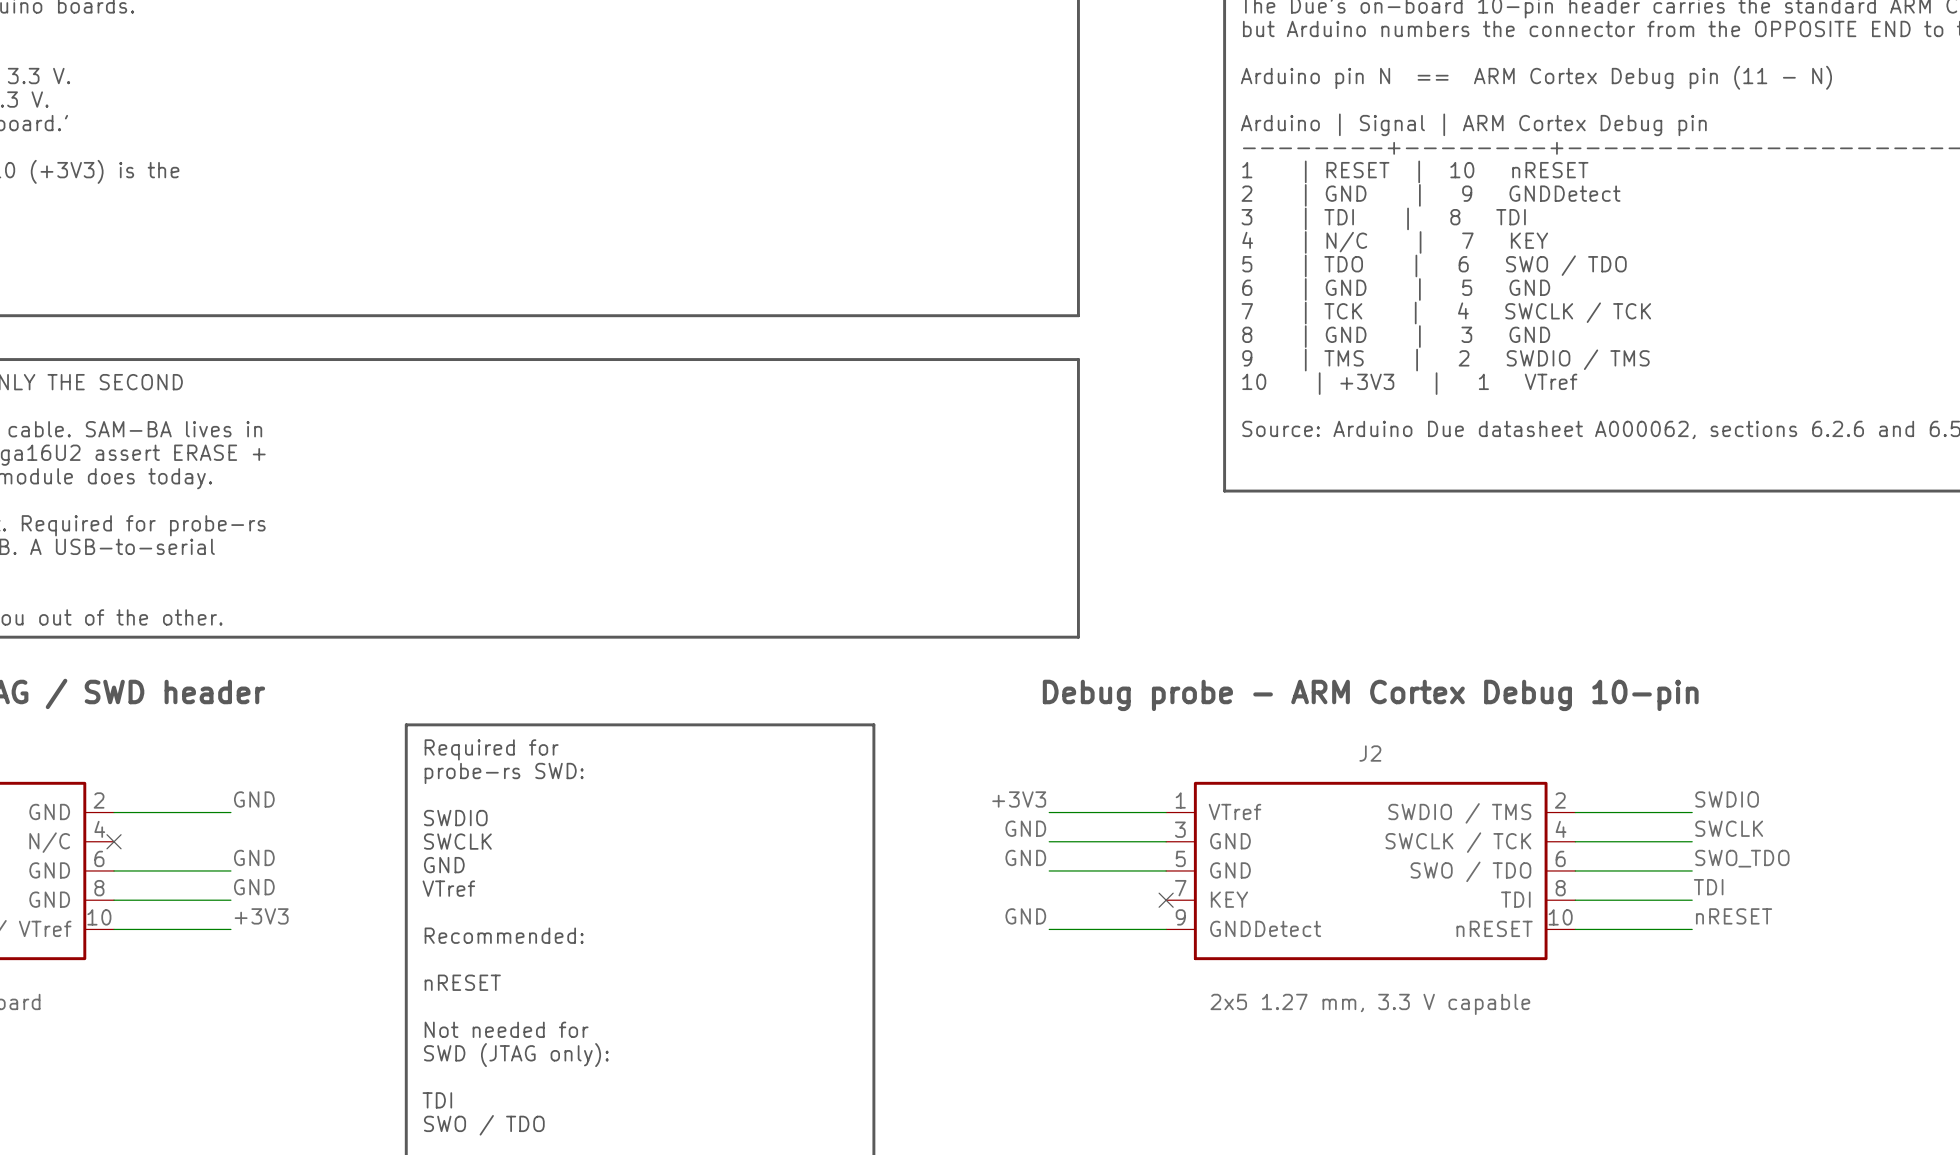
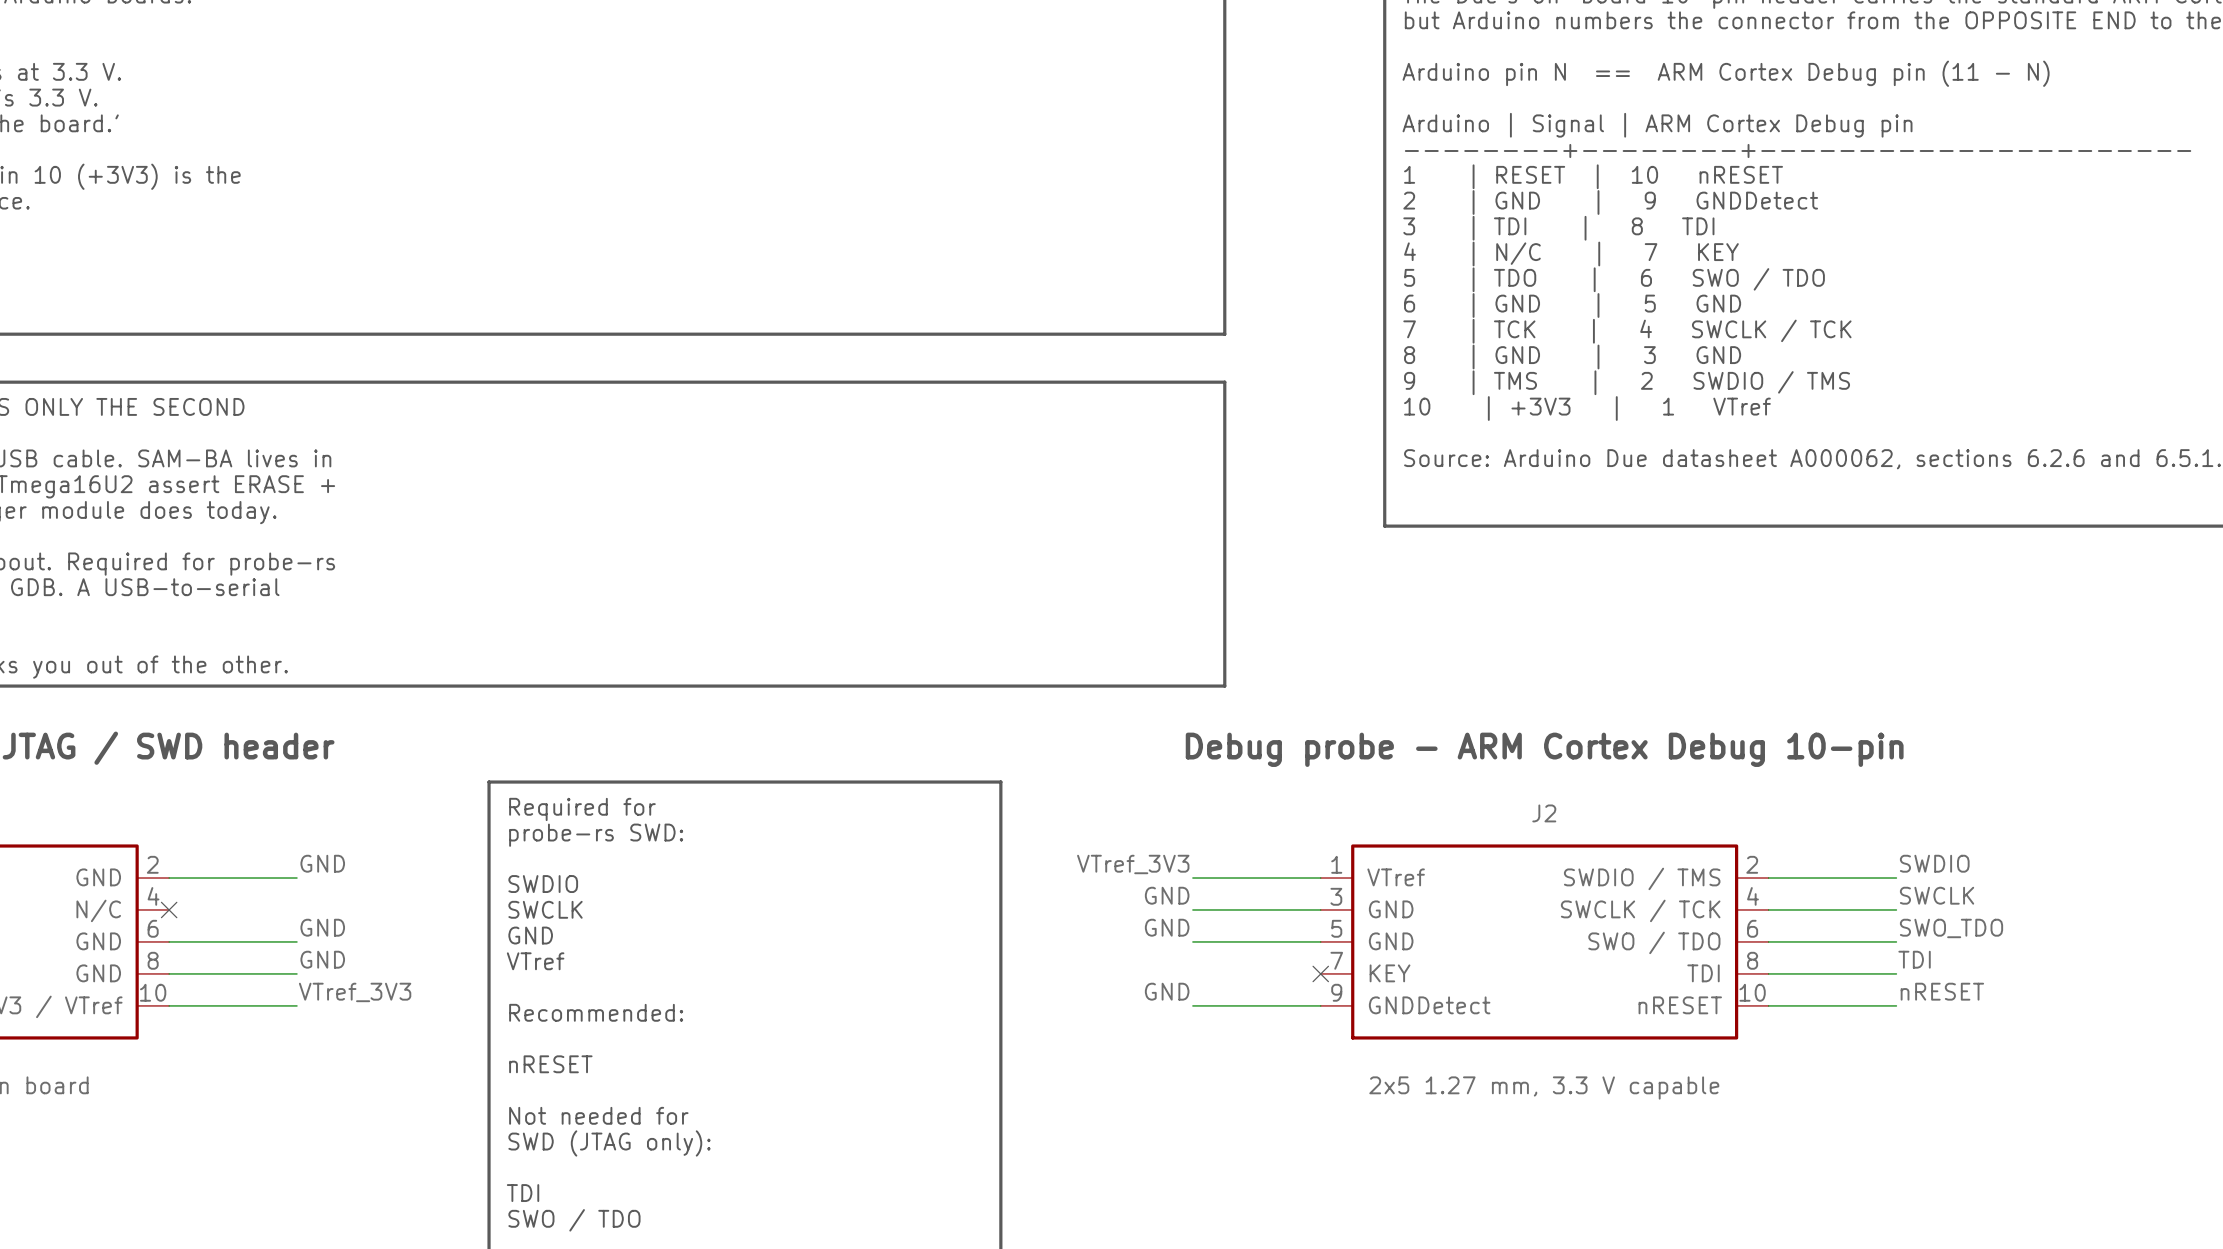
label: +3V3 (1019, 799) -> VTref_3V3 (1133, 864)
label: +3V3 (261, 916) -> VTref_3V3 (355, 992)

